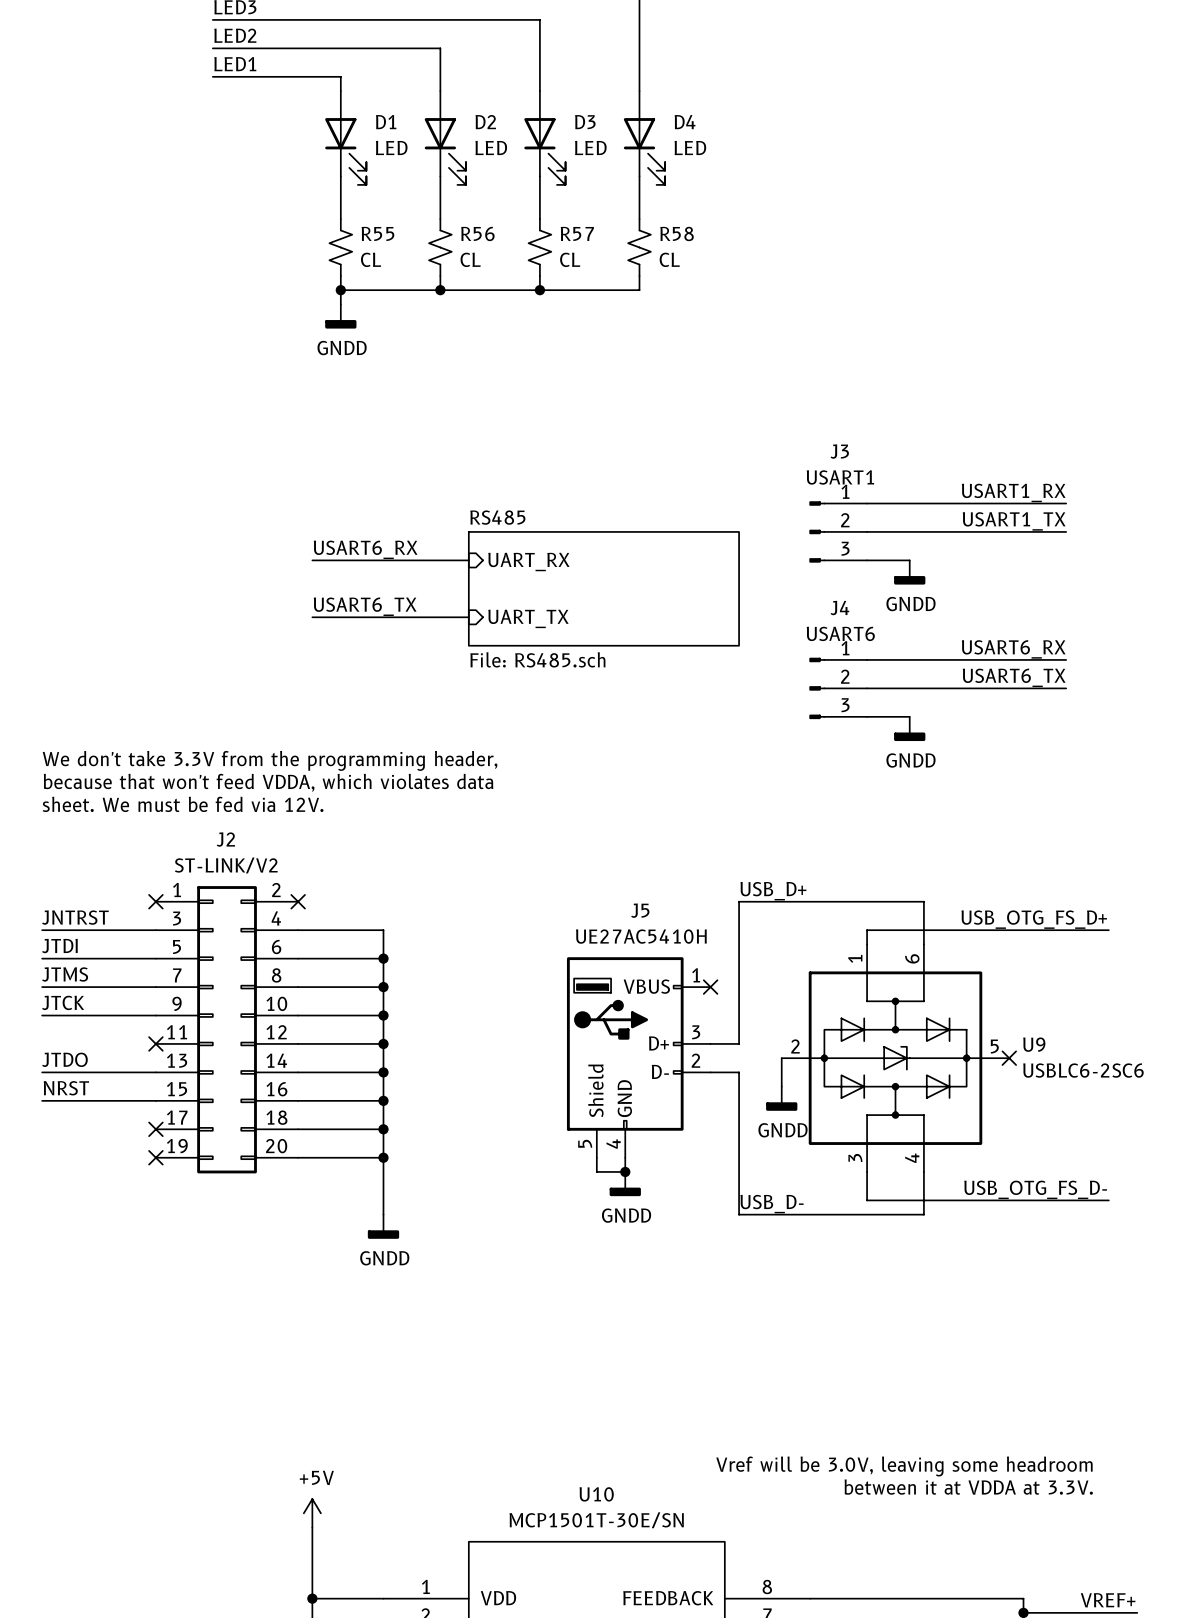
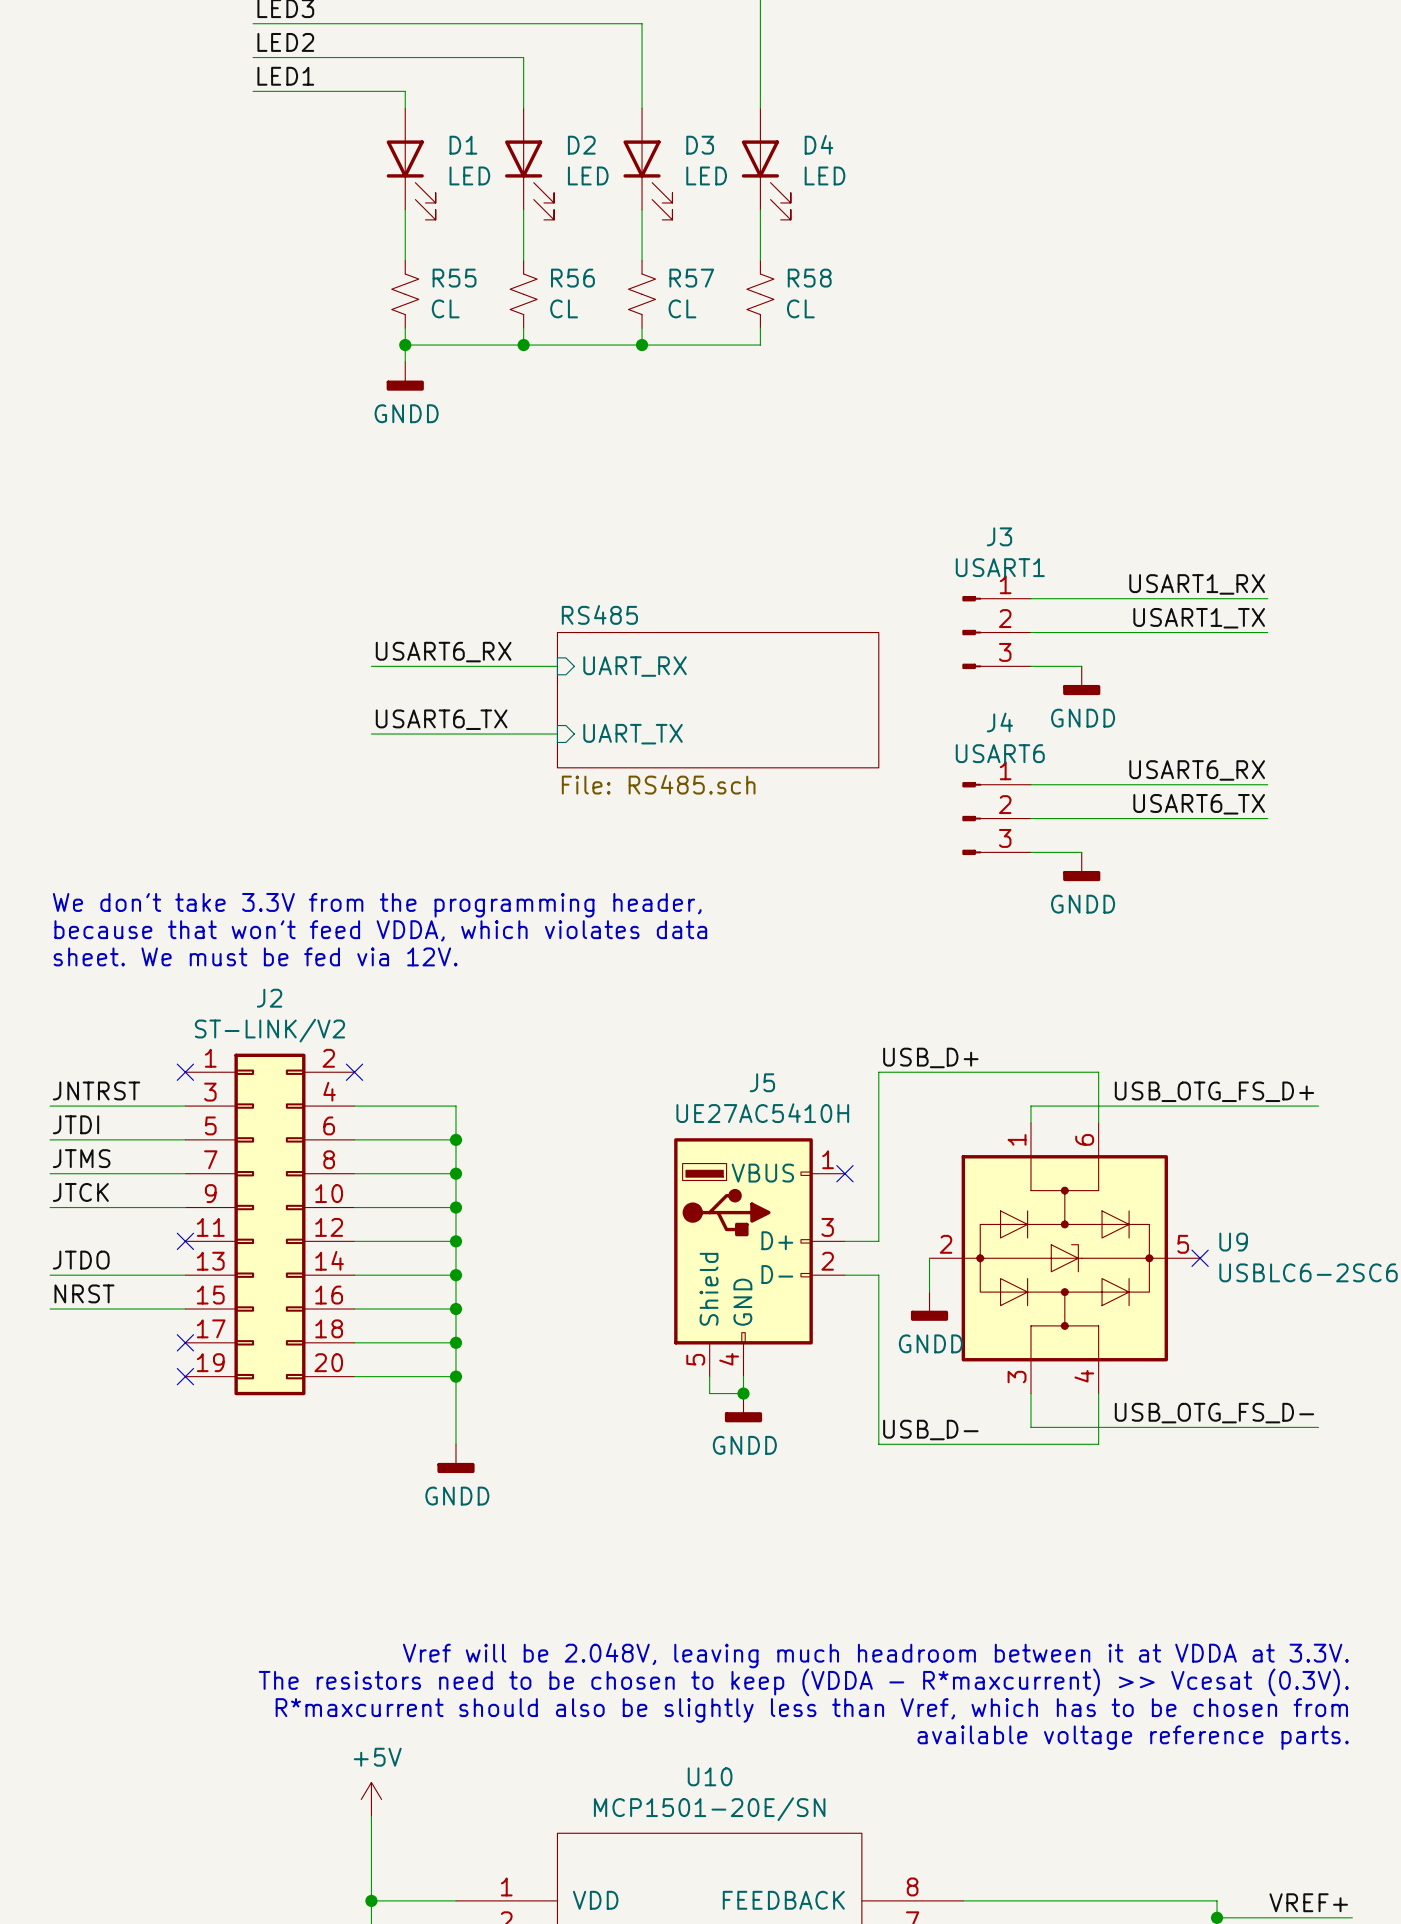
text: none -> Vref will be 2.048V, leaving much headroom between it at VDDA at 3.3V. (875, 1655)
text: none -> The resistors need to be chosen to keep (VDDA - R*maxcurrent) >> Vcesat (0.3V). (803, 1682)
text: none -> R*maxcurrent should also be slightly less than Vref, which has to be chosen from (811, 1710)
text: none -> available voltage reference parts. (1133, 1737)
text: Vref will be 3.0V, leaving some headroom (904, 1466) -> none
text: between it at VDDA at 3.3V. (968, 1487) -> none
U10 value: MCP1501T-30E/SN (596, 1520) -> MCP1501-20E/SN (709, 1809)

